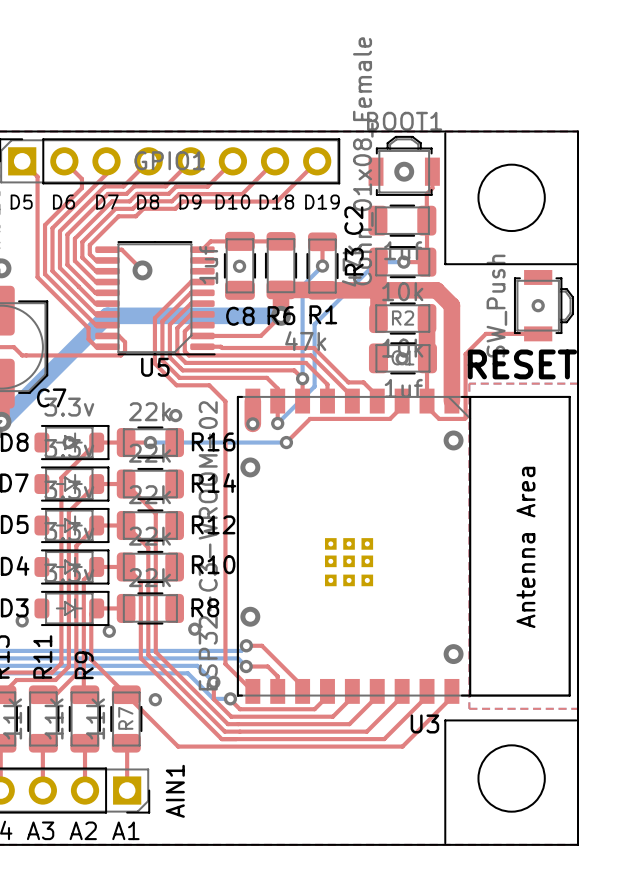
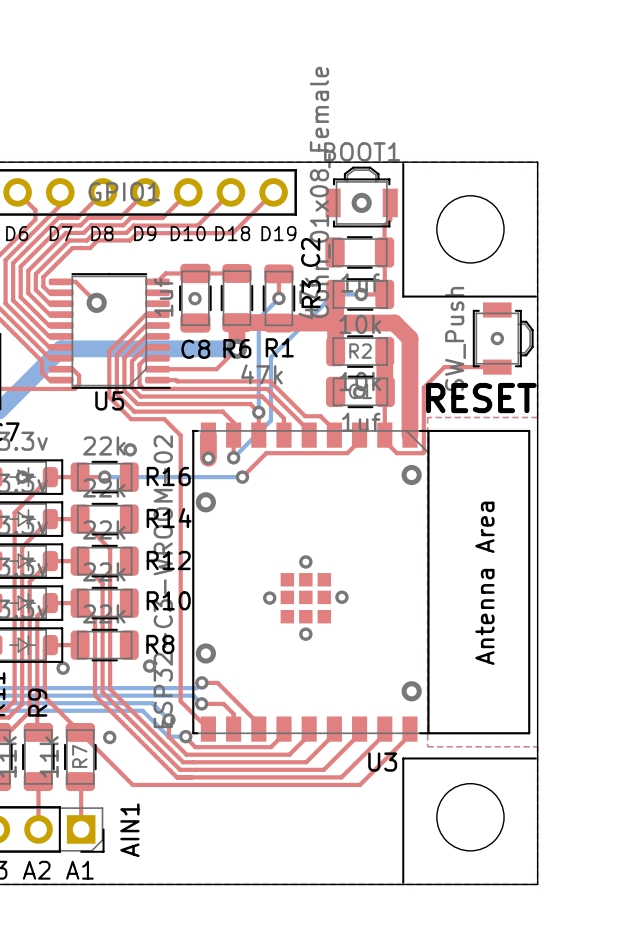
U3 footprint: [236, 388, 571, 704] -> [192, 422, 531, 742]
via: none -> (305, 561)
via: none -> (341, 597)
via: none -> (269, 598)
via: none -> (305, 634)

